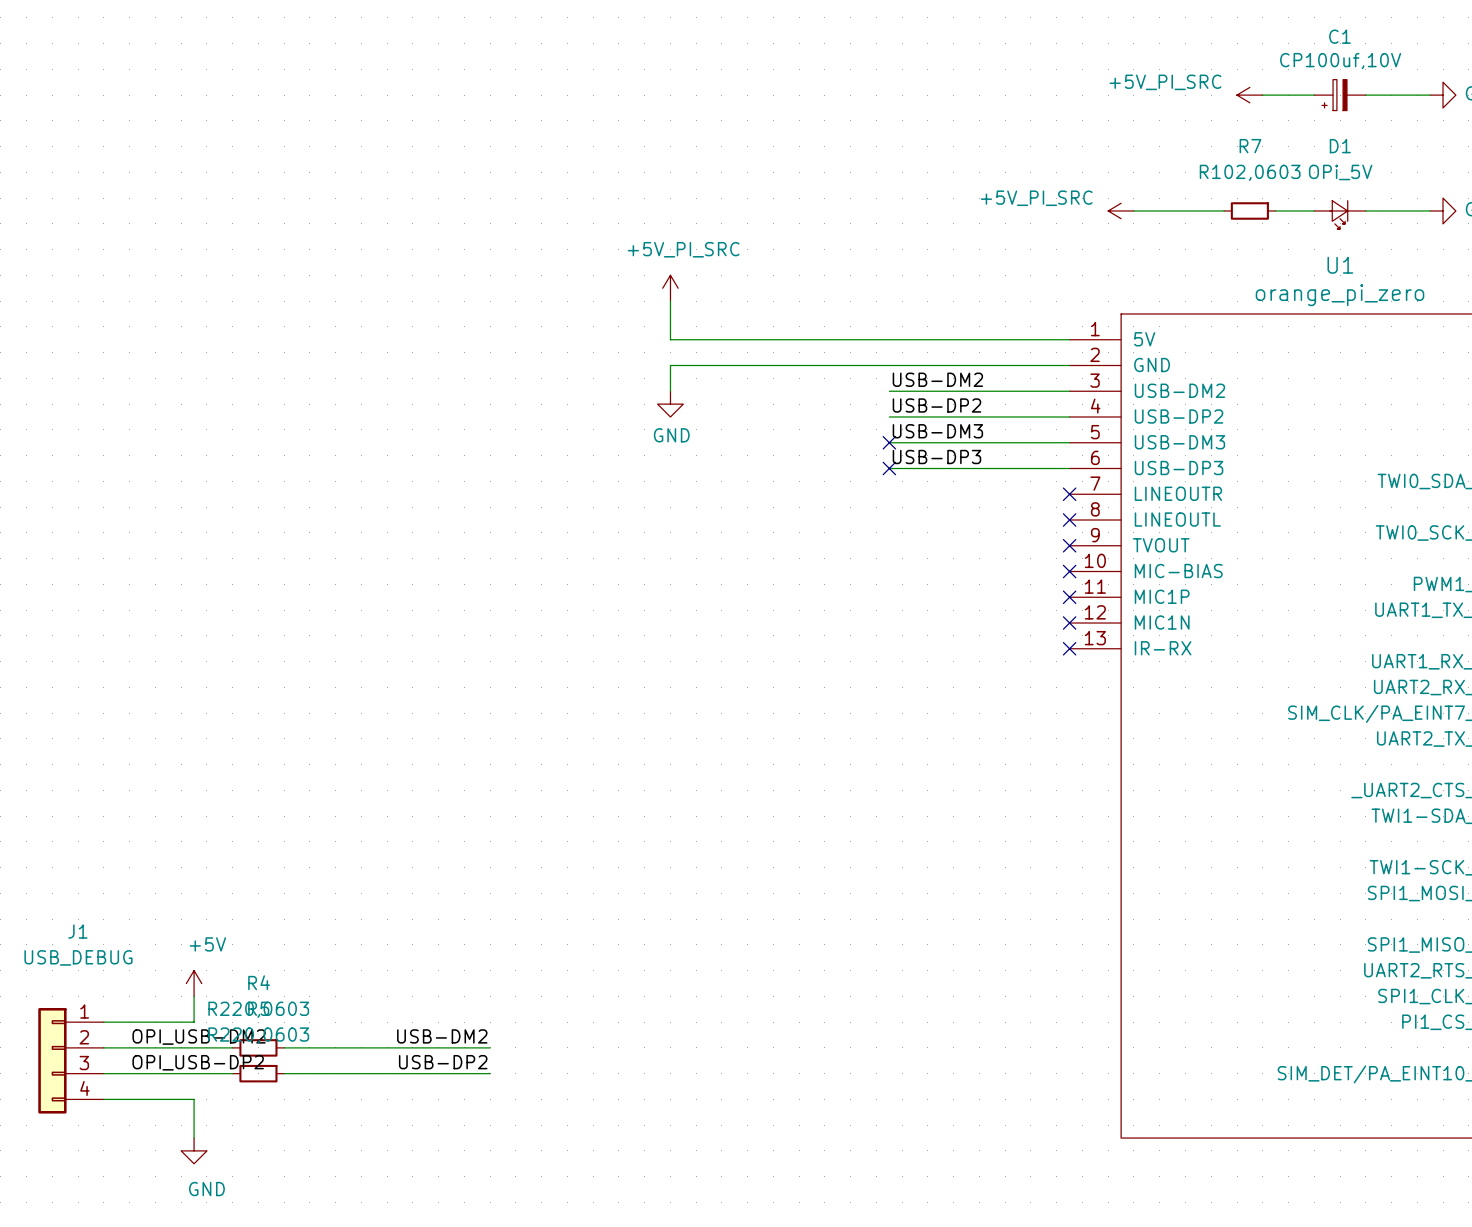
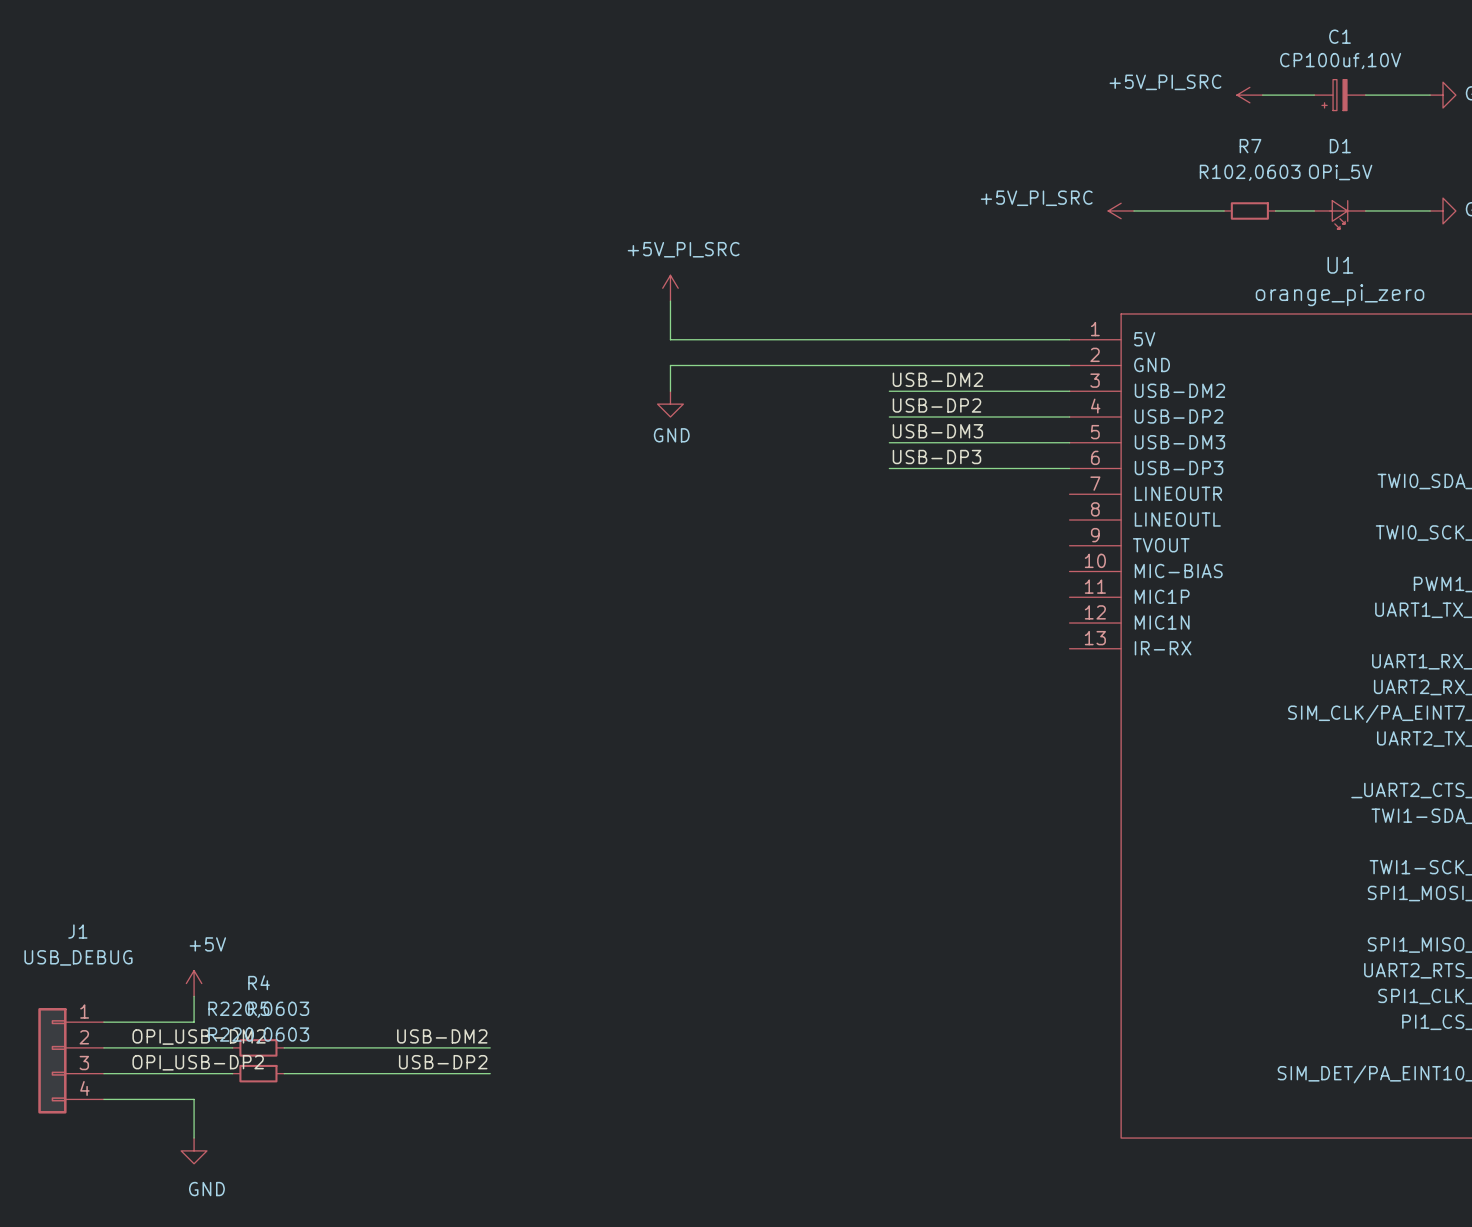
no-connect mark: (889, 442) -> none
no-connect mark: (889, 468) -> none
no-connect mark: (1069, 494) -> none
no-connect mark: (1069, 520) -> none
no-connect mark: (1069, 545) -> none
no-connect mark: (1069, 571) -> none
no-connect mark: (1069, 597) -> none
no-connect mark: (1069, 623) -> none
no-connect mark: (1069, 648) -> none

